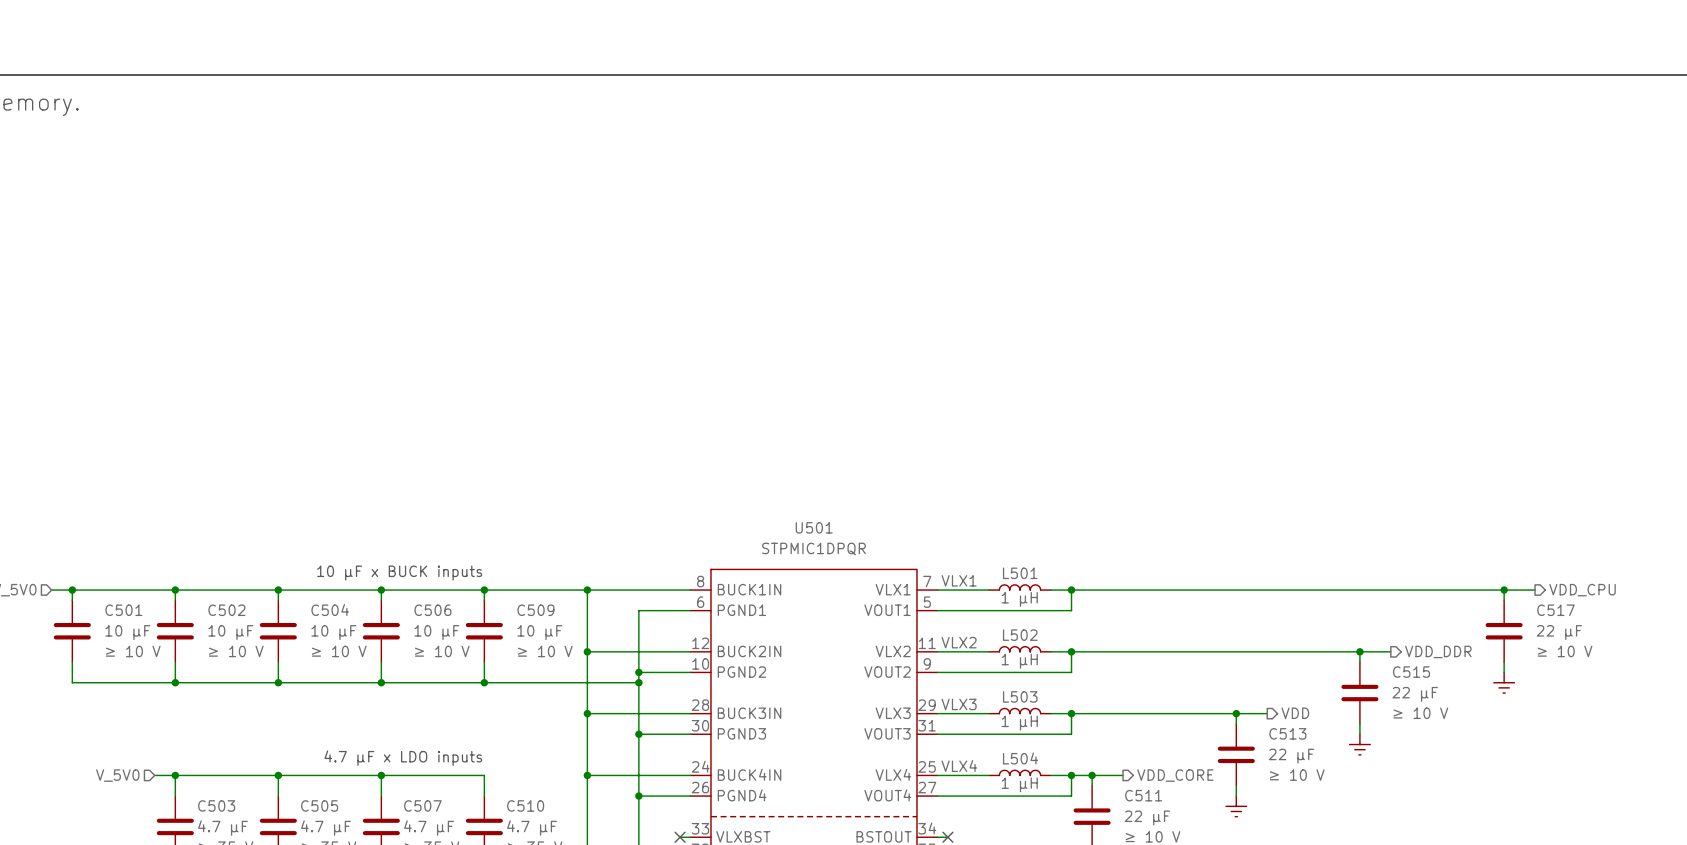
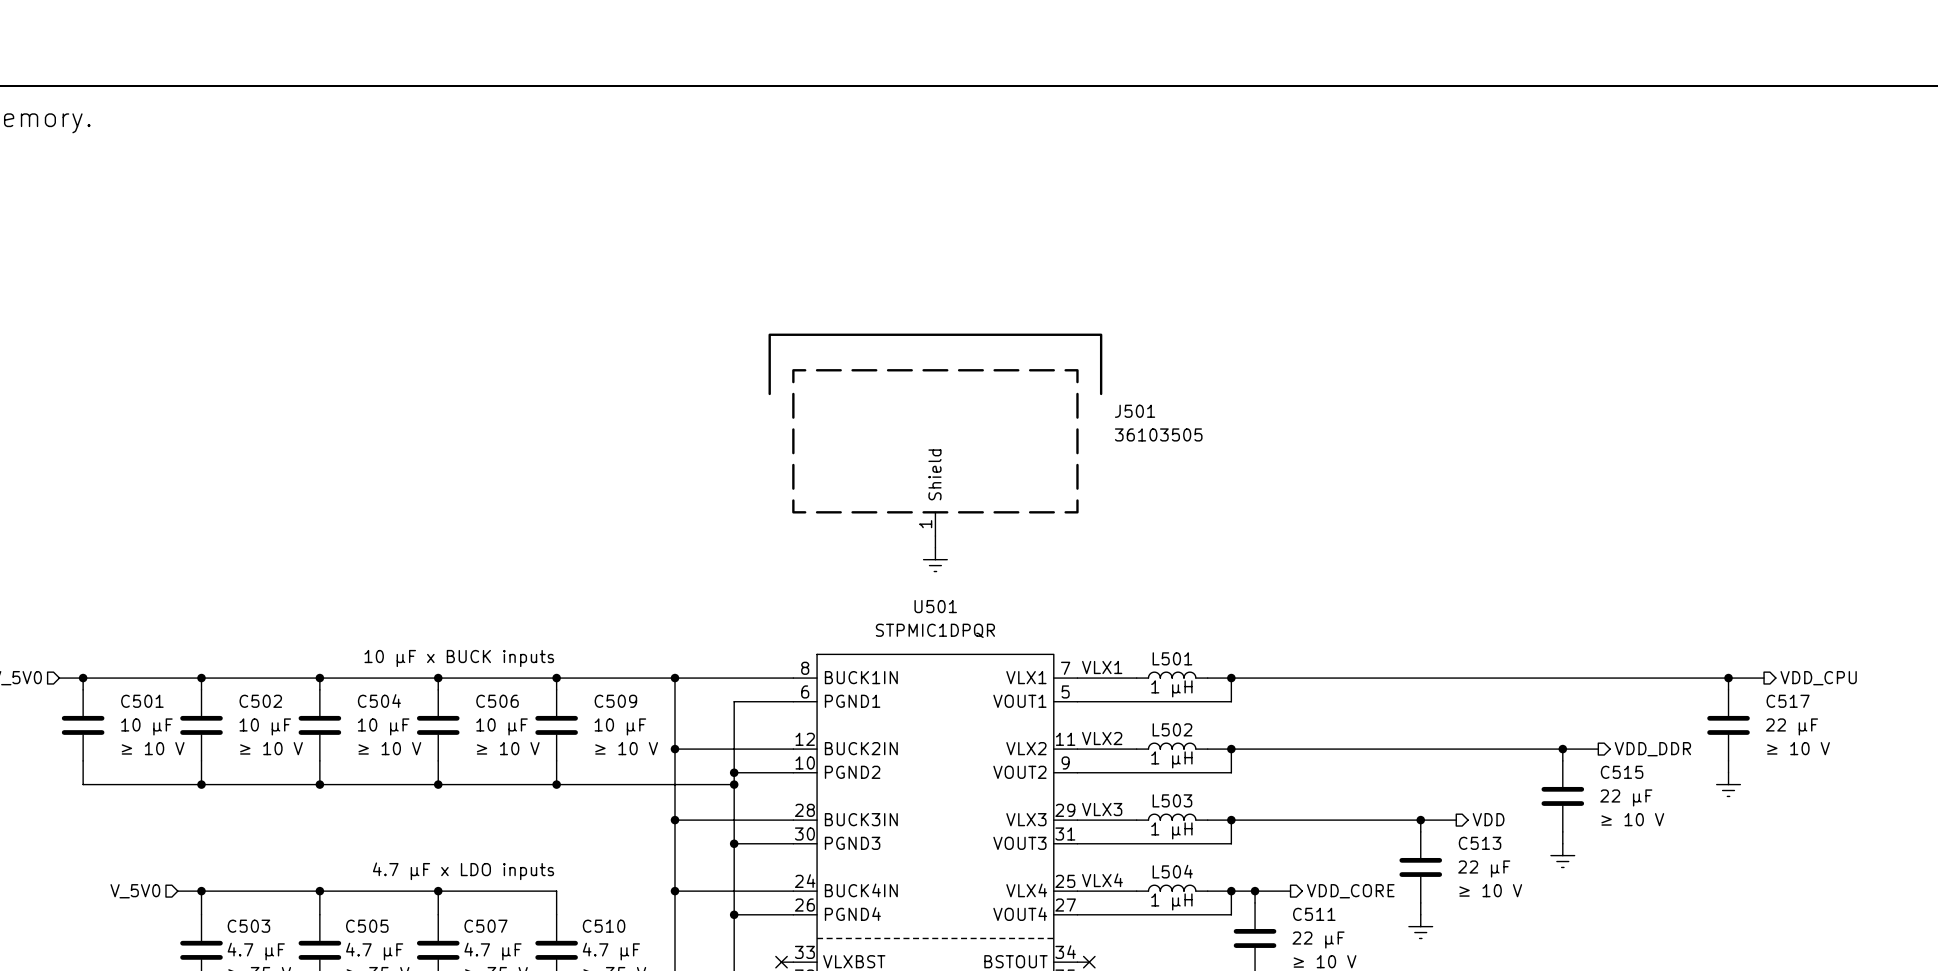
J501: none -> 36103505 (935, 434)
wire: none -> (935, 536) (935, 547)
power symbol: none -> (935, 559)

